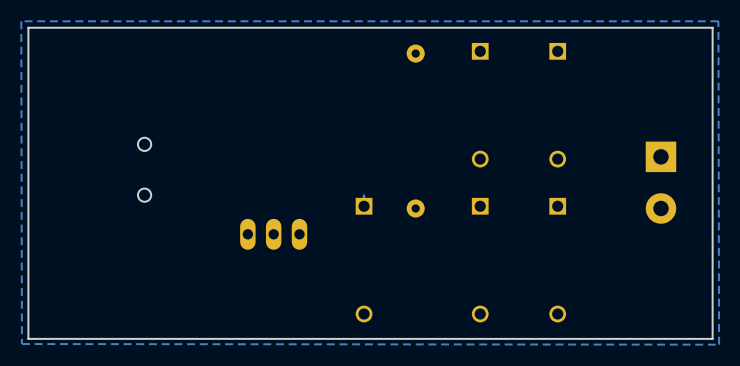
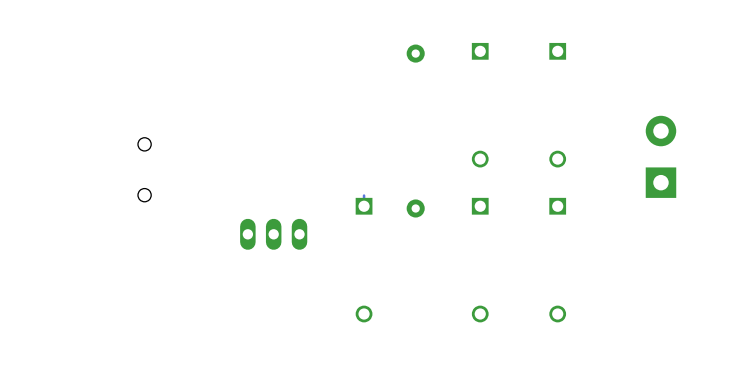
zone outline: (718, 21) (719, 344) (21, 344) (21, 21) (718, 21) -> none
board edge: (712, 27) (712, 338) (28, 338) (28, 27) (712, 27) -> none
part rotation: 0° (660, 182) -> 180° (660, 156)

